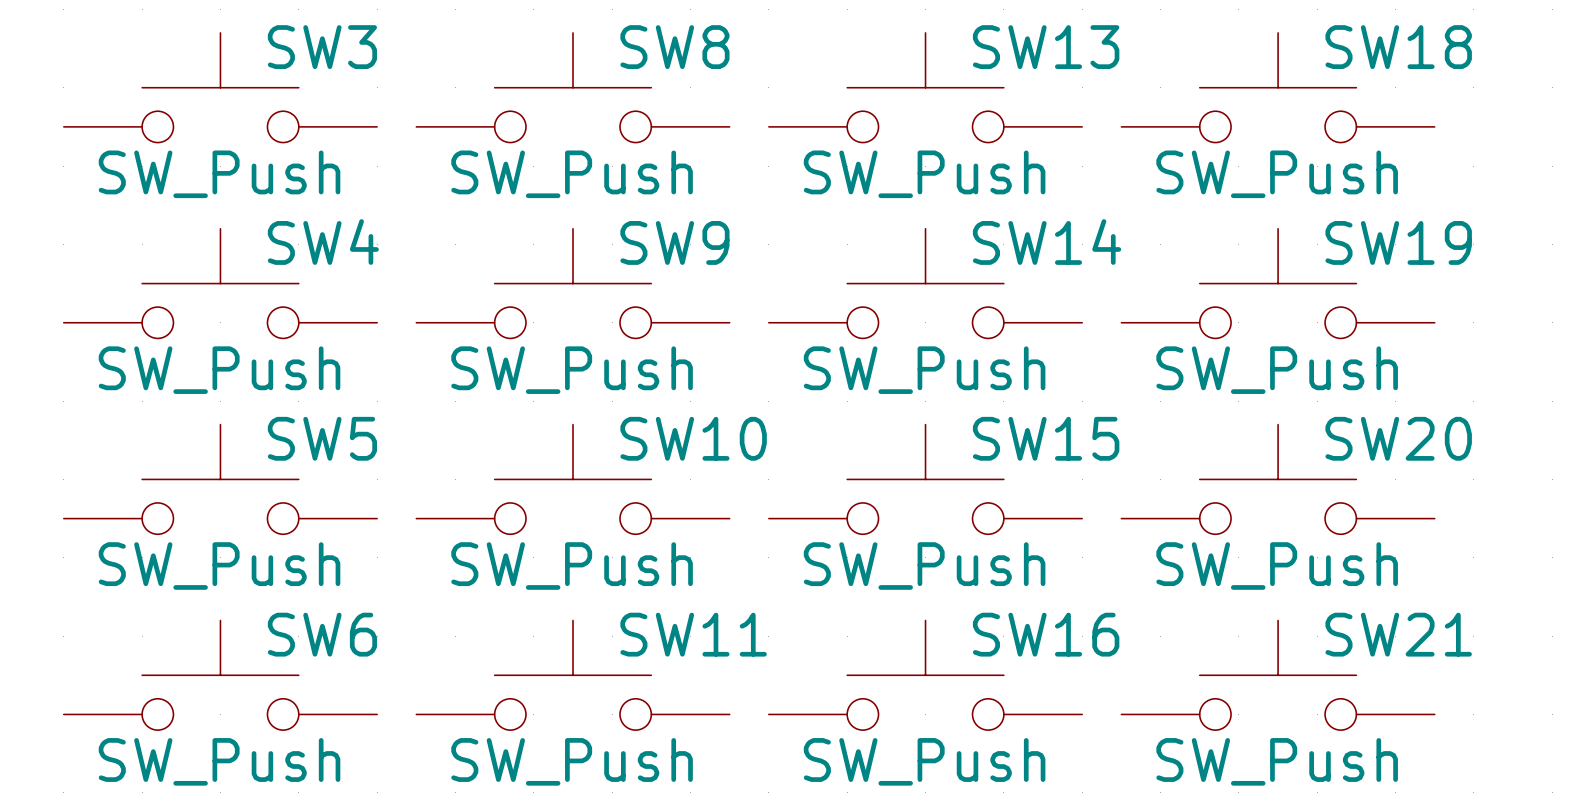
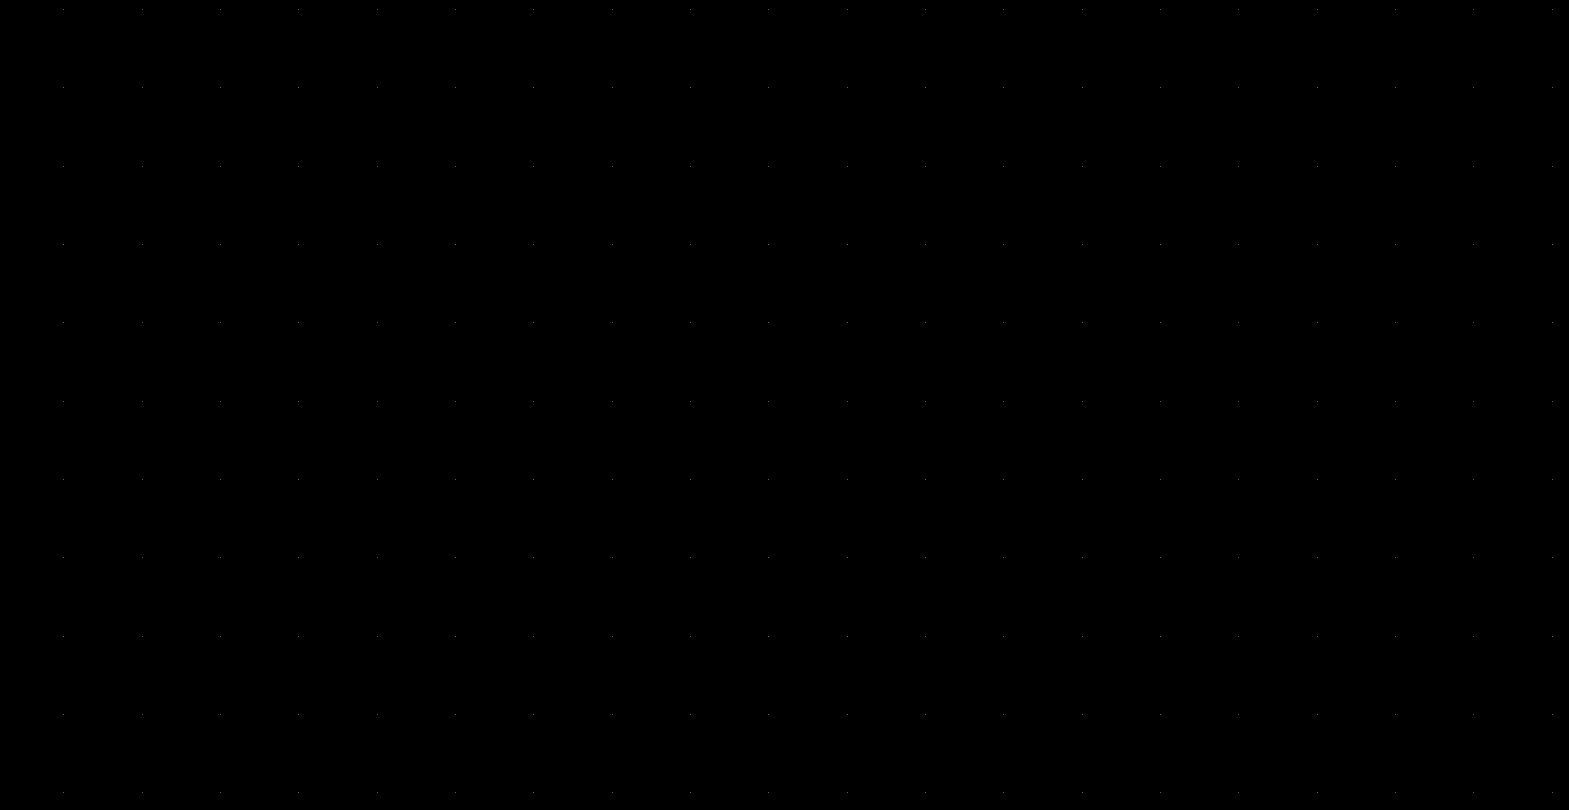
SW3: SW_Push (220, 87) -> none
SW8: SW_Push (572, 87) -> none
SW13: SW_Push (925, 87) -> none
SW18: SW_Push (1278, 87) -> none
SW4: SW_Push (220, 283) -> none
SW9: SW_Push (572, 283) -> none
SW14: SW_Push (925, 283) -> none
SW19: SW_Push (1278, 283) -> none
SW5: SW_Push (220, 479) -> none
SW10: SW_Push (572, 479) -> none
SW15: SW_Push (925, 479) -> none
SW20: SW_Push (1278, 479) -> none
SW6: SW_Push (220, 675) -> none
SW11: SW_Push (572, 675) -> none
SW16: SW_Push (925, 675) -> none
SW21: SW_Push (1278, 675) -> none

